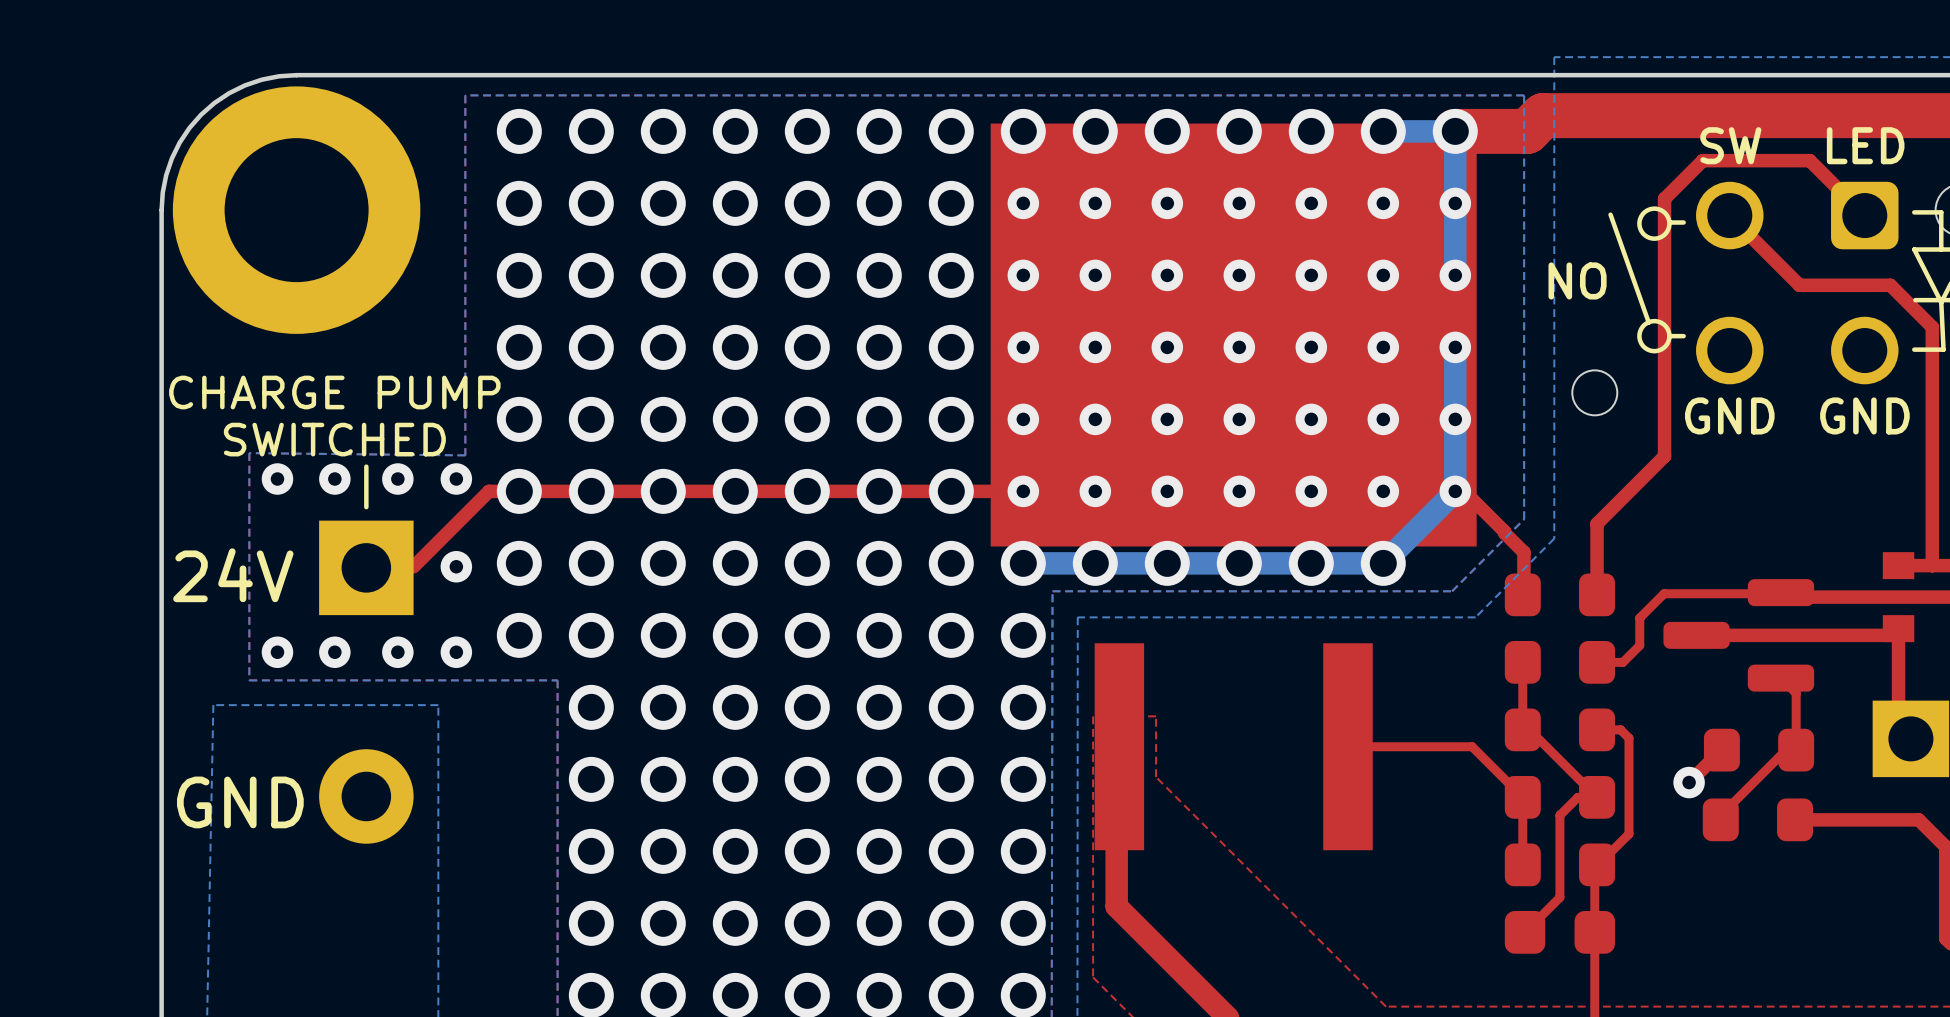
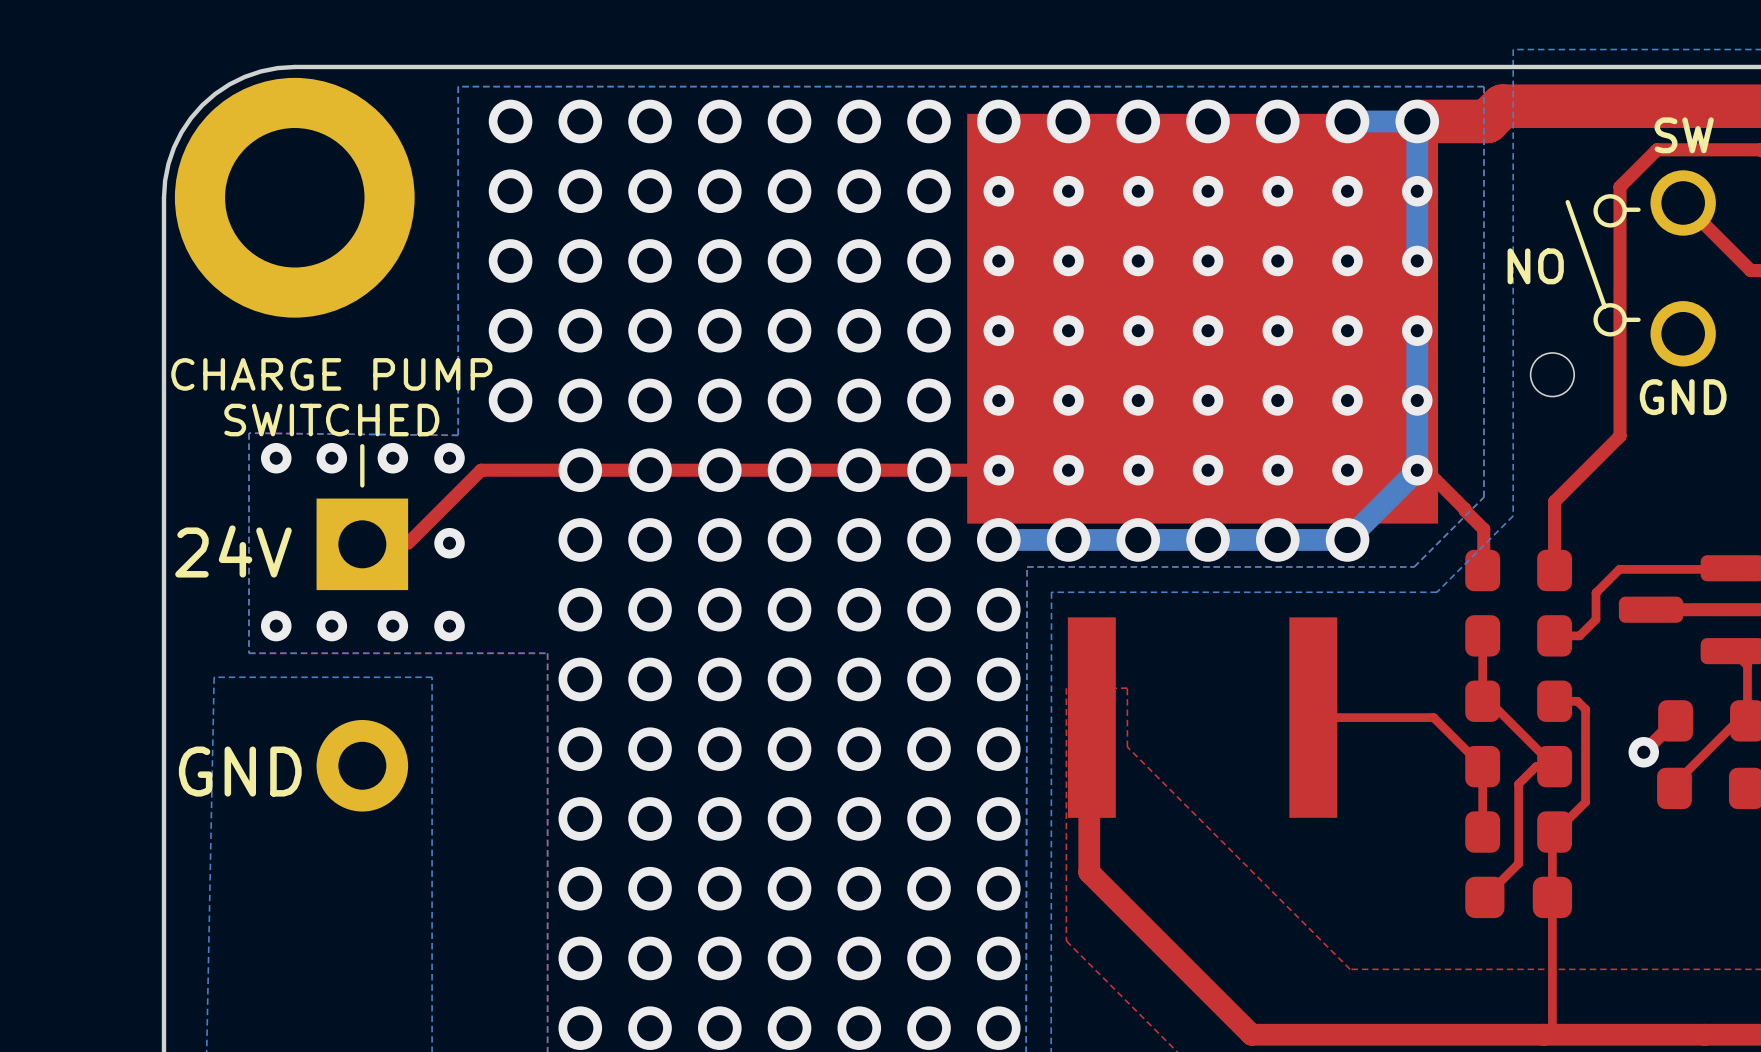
via: (519, 491) -> none
via: (519, 563) -> none
via: (519, 635) -> none

